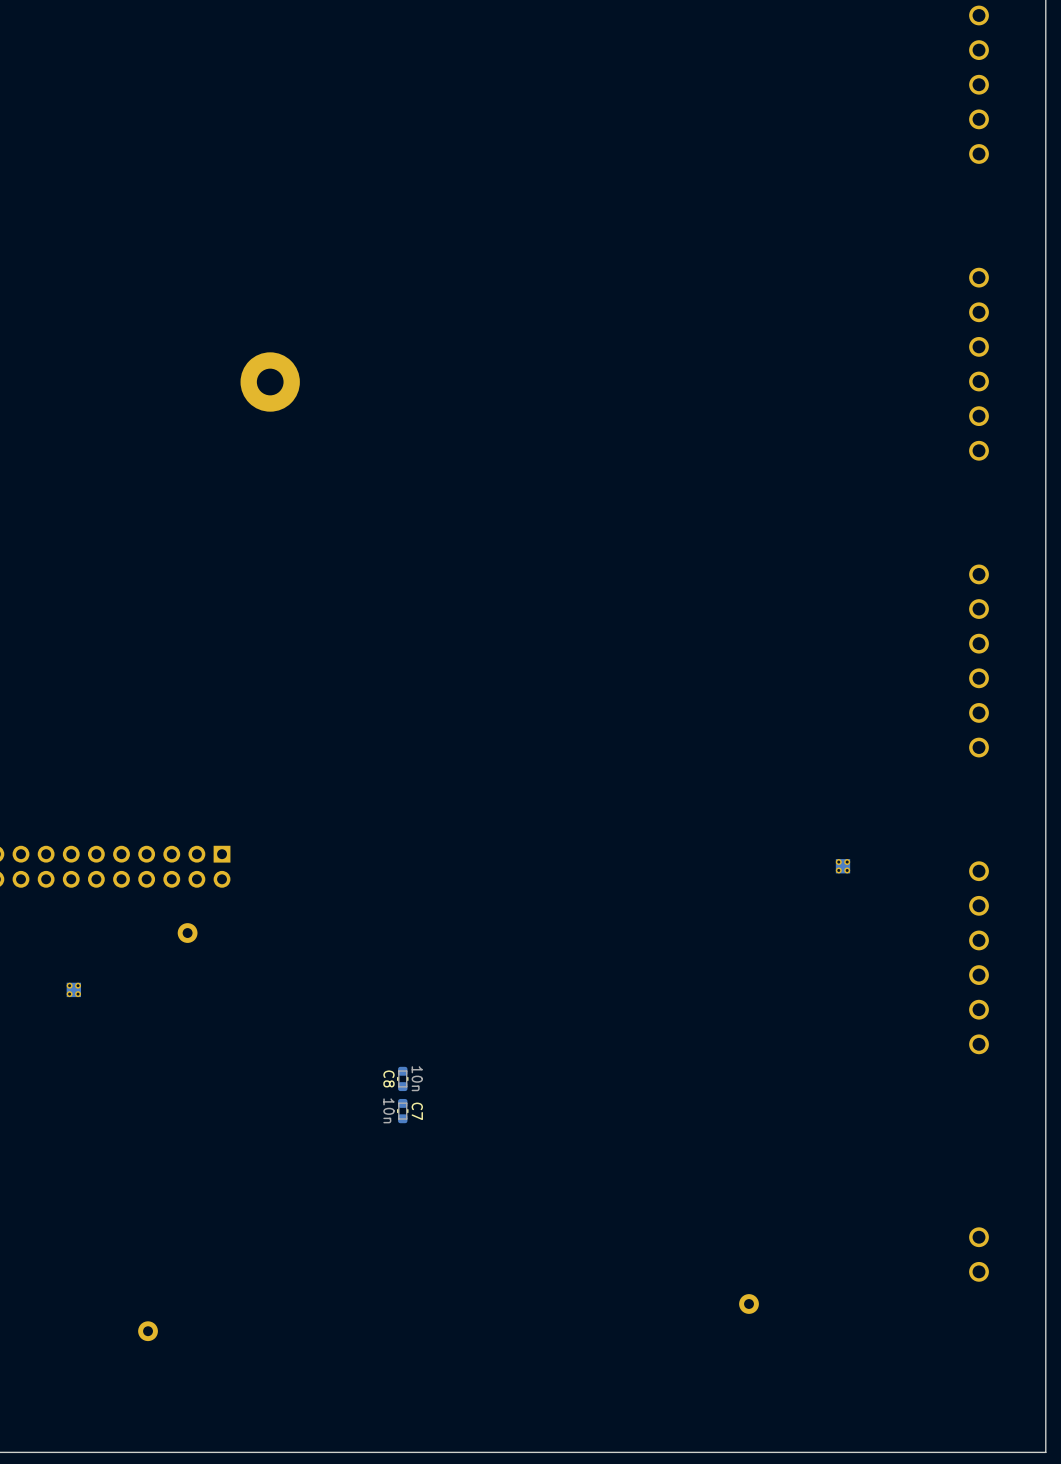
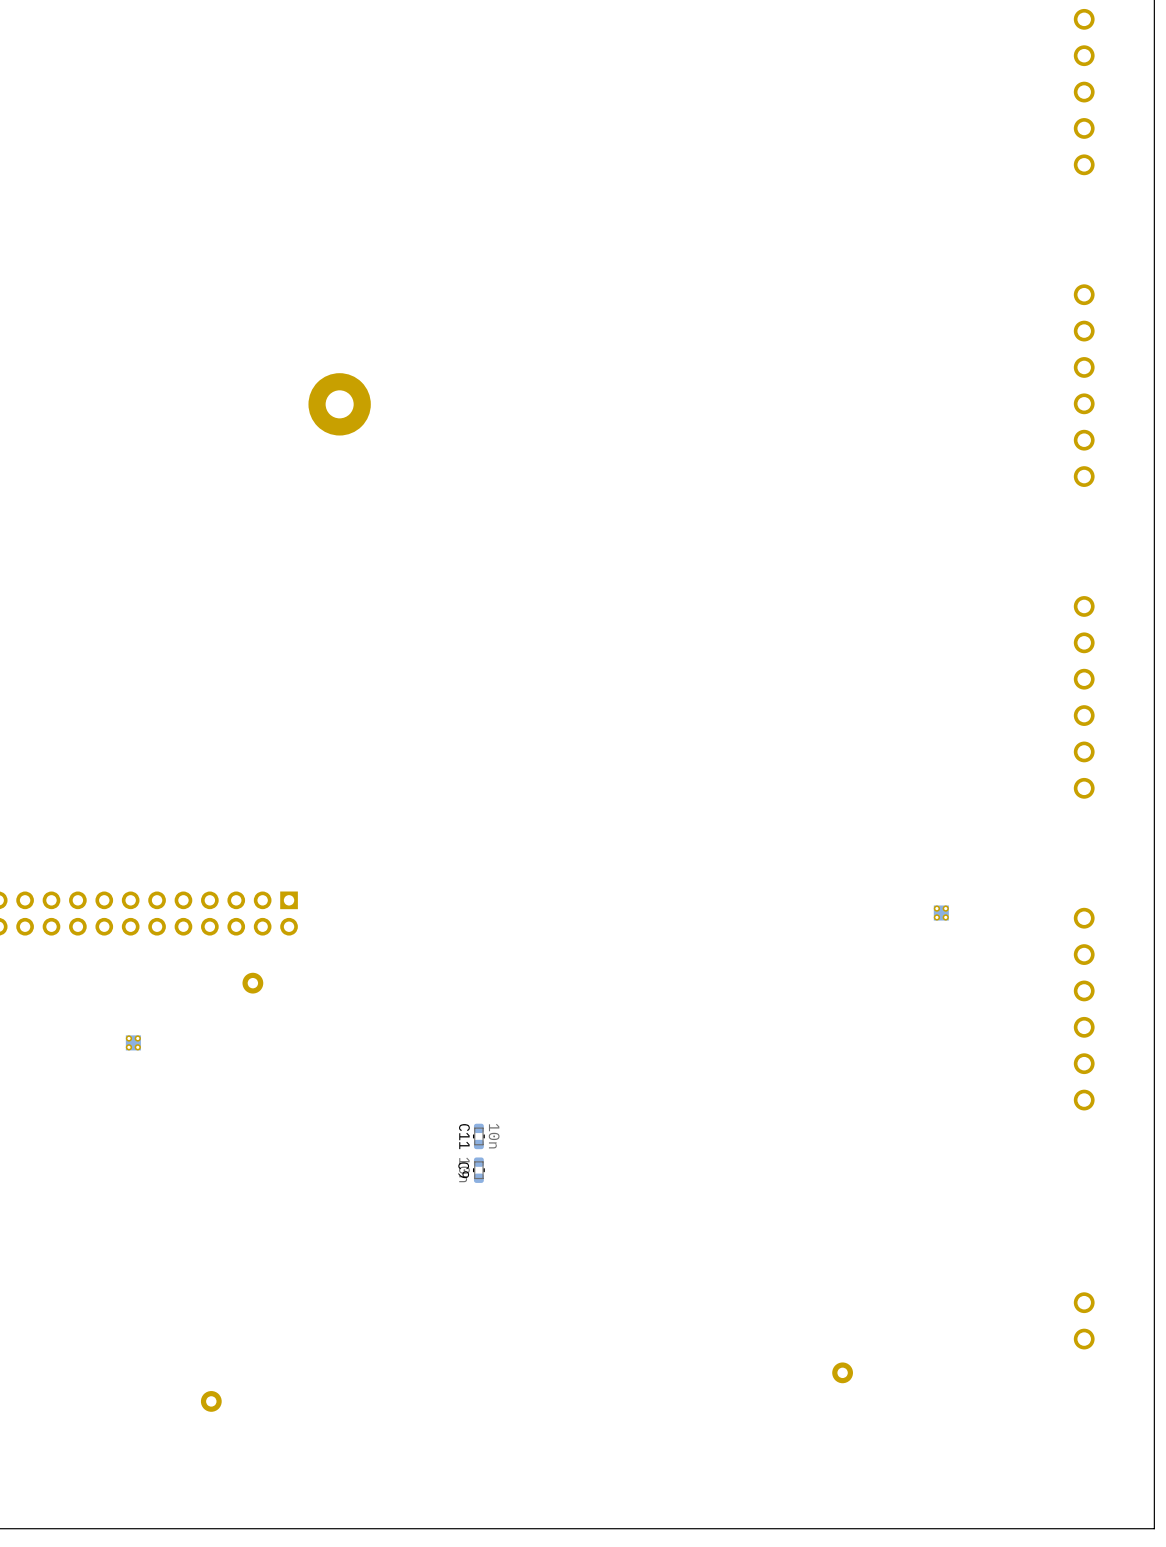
C8 name: C8 (388, 1078) -> C11 (464, 1136)
C7 name: C7 (417, 1111) -> C9 (463, 1170)

